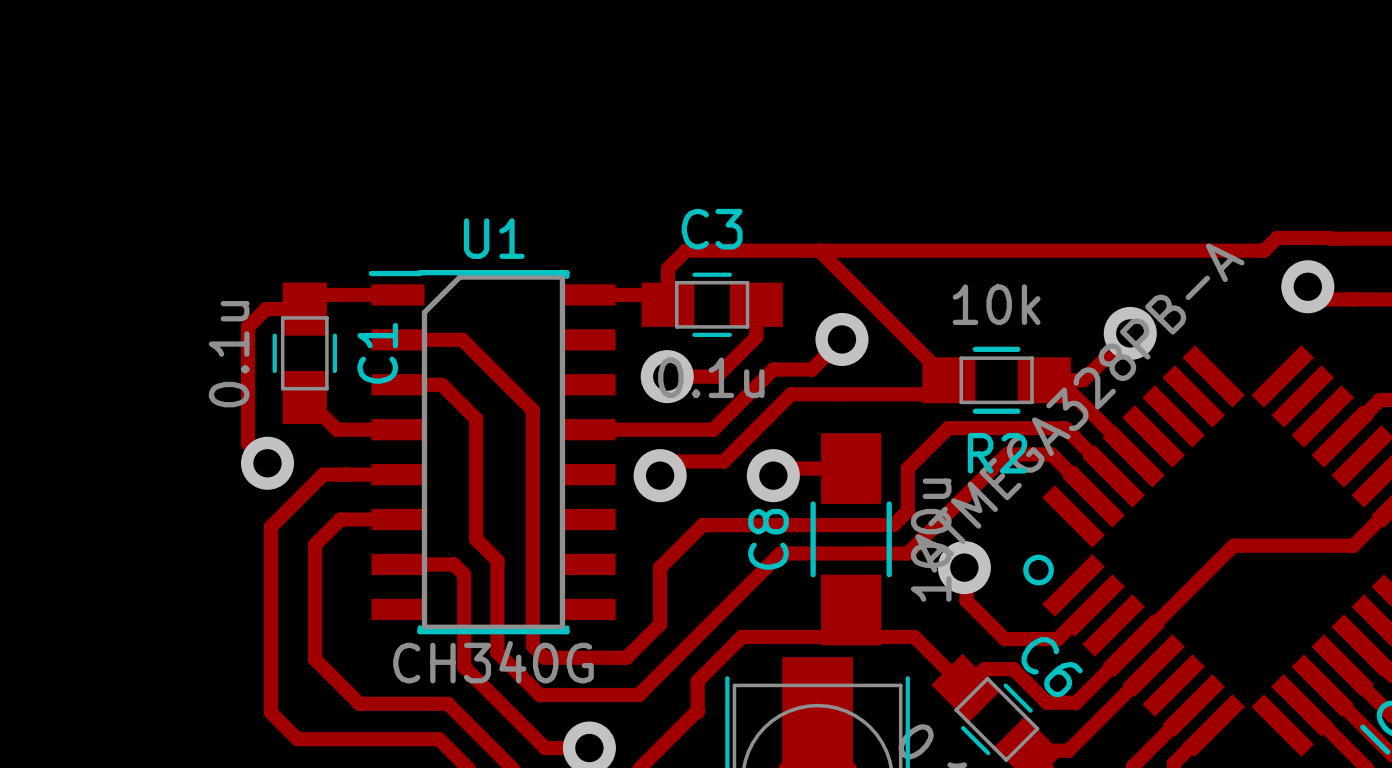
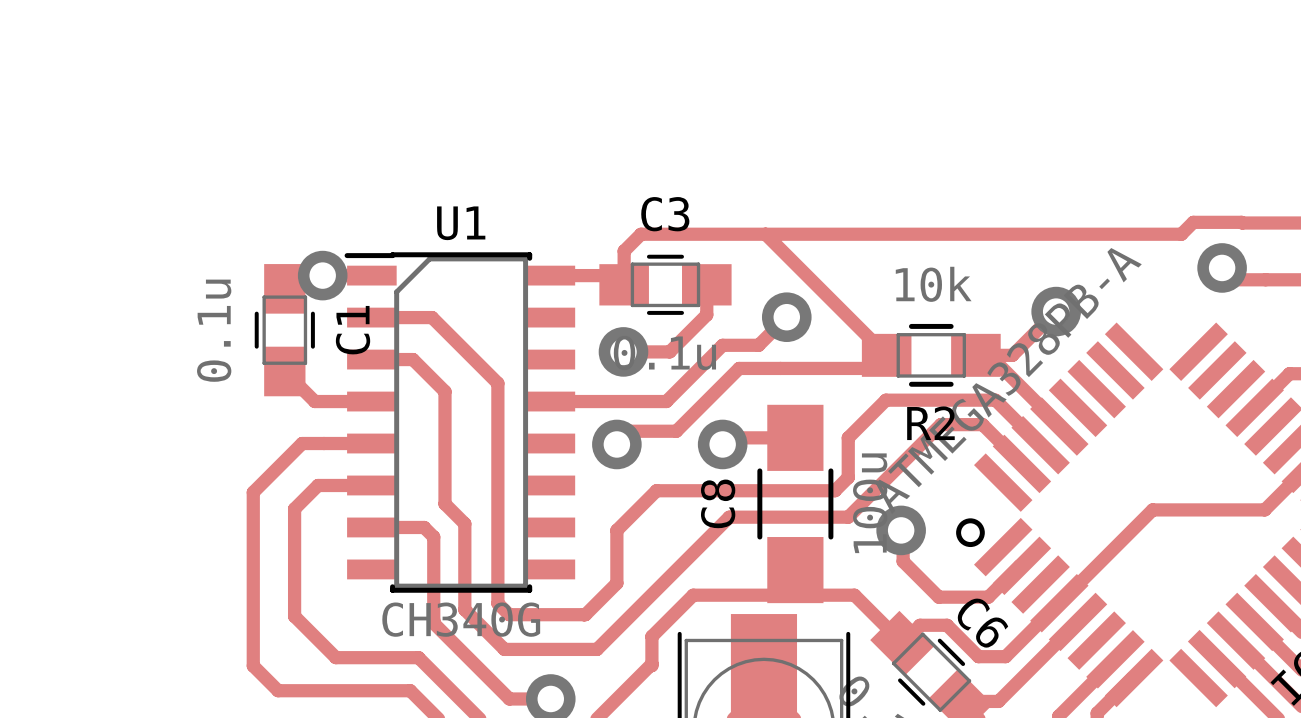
track: (321, 294) (304, 309) (266, 309) (248, 327) (248, 443) (267, 463) -> none
via position: (267, 463) -> (322, 275)

